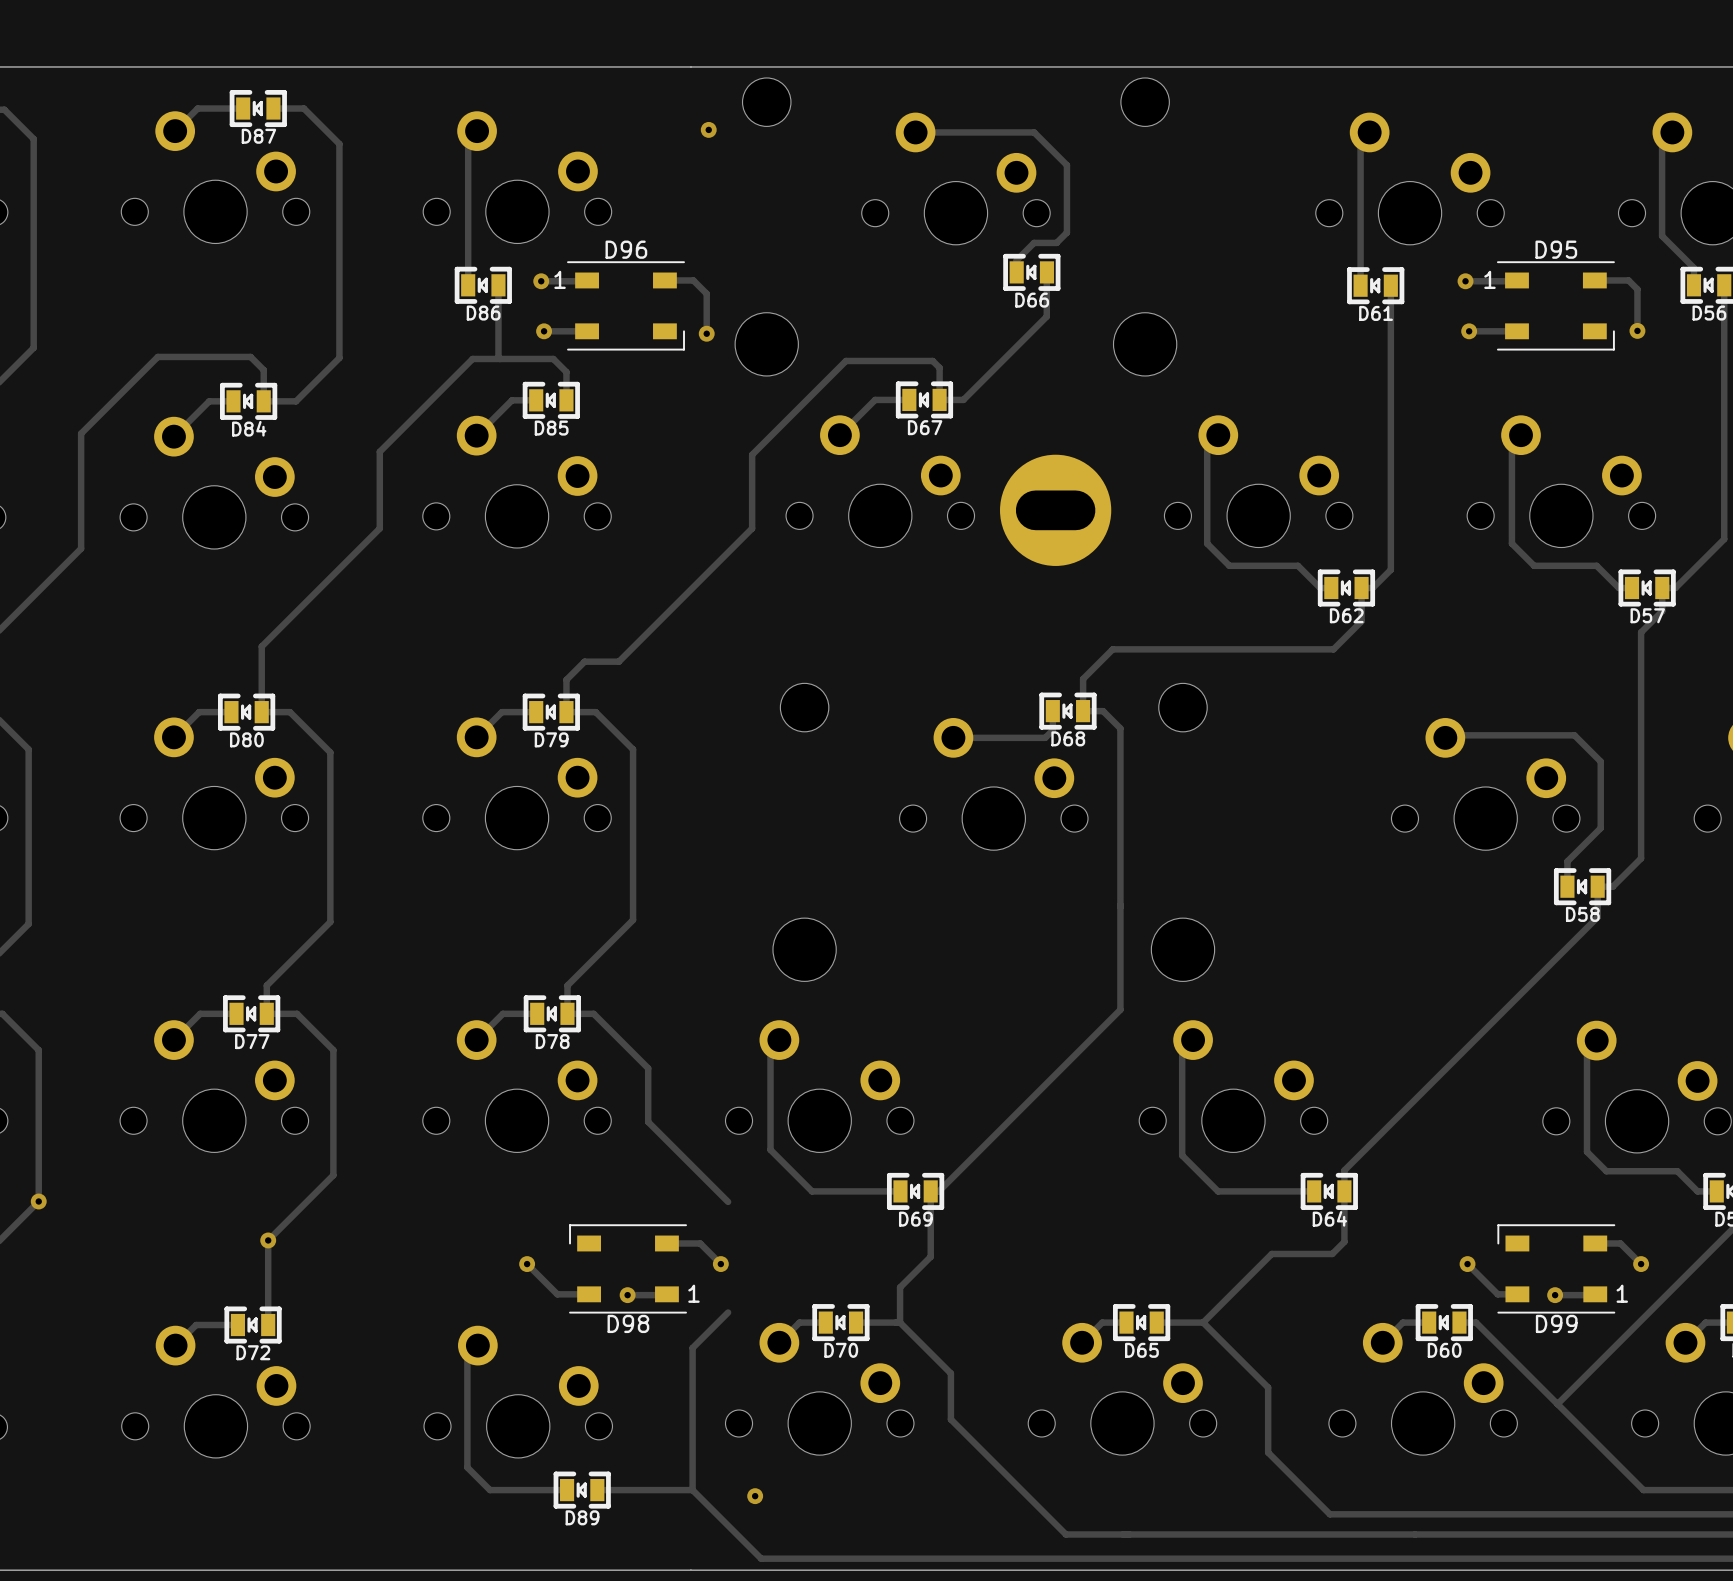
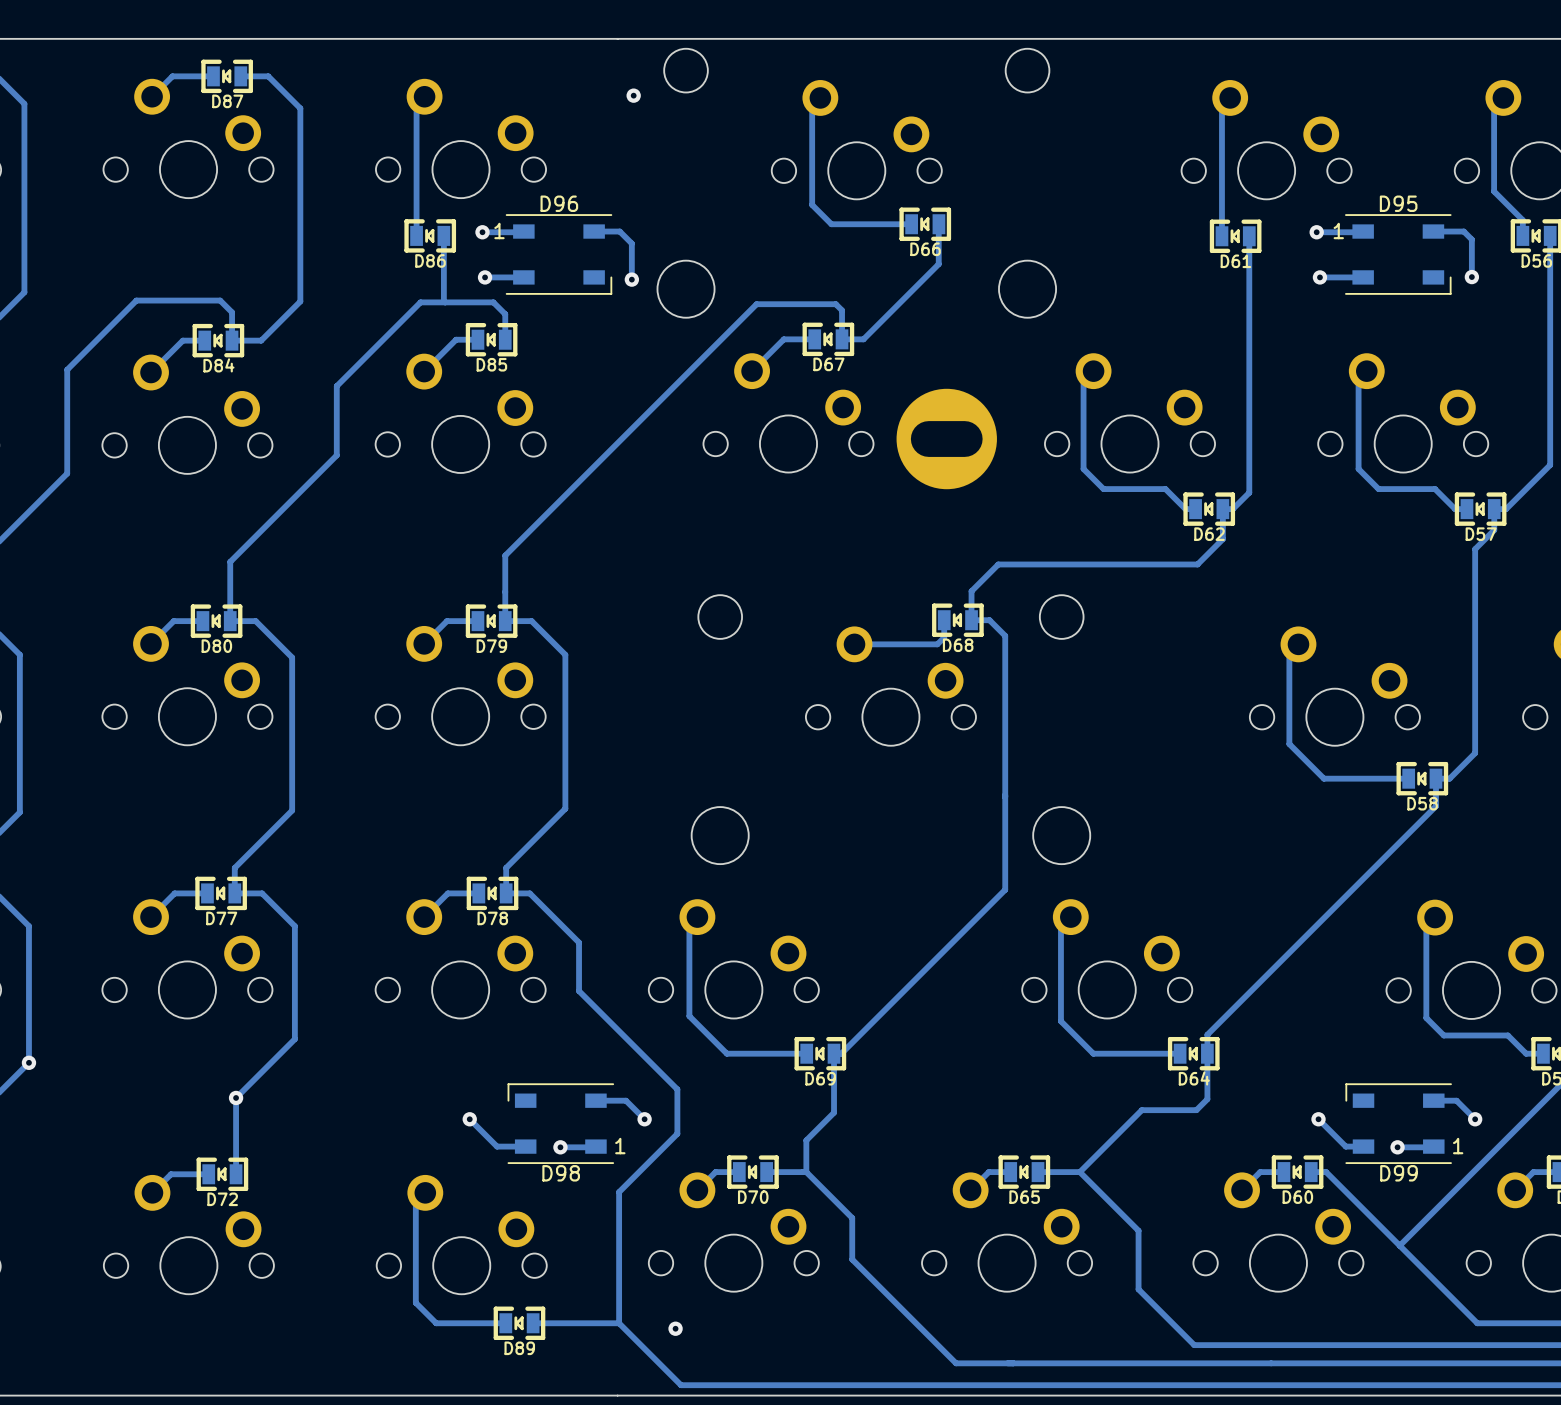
track: (915, 132) (1034, 132) (1066, 165) (1066, 232) (1056, 242) (1034, 242) (1016, 260) (1016, 272) -> (820, 97) (812, 106) (812, 204) (831, 224) (911, 224)
track: (845, 360) (752, 454) (752, 528) (618, 661) (584, 661) (566, 679) -> (757, 304) (505, 555) (505, 591)
track: (1447, 735) (1574, 735) (1600, 761) (1600, 828) (1567, 861) (1567, 886) -> (1298, 644) (1289, 653) (1289, 744) (1323, 778) (1408, 778)
track: (728, 1312) (692, 1348) -> (651, 1063) (677, 1089) (677, 1133) (619, 1192) (619, 1195)

